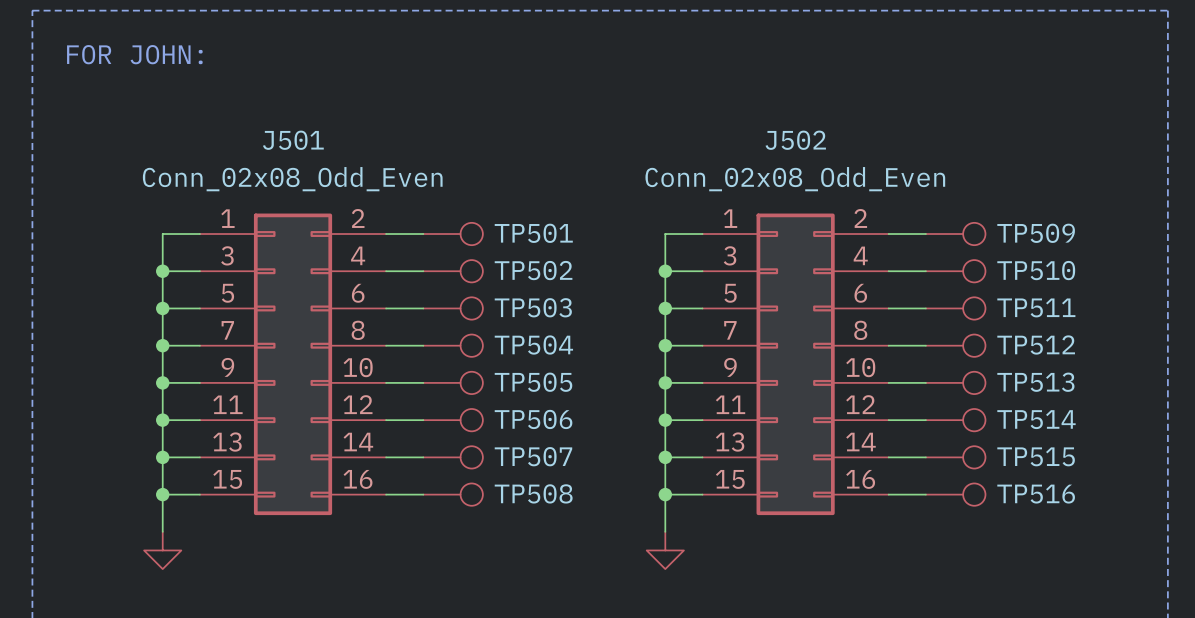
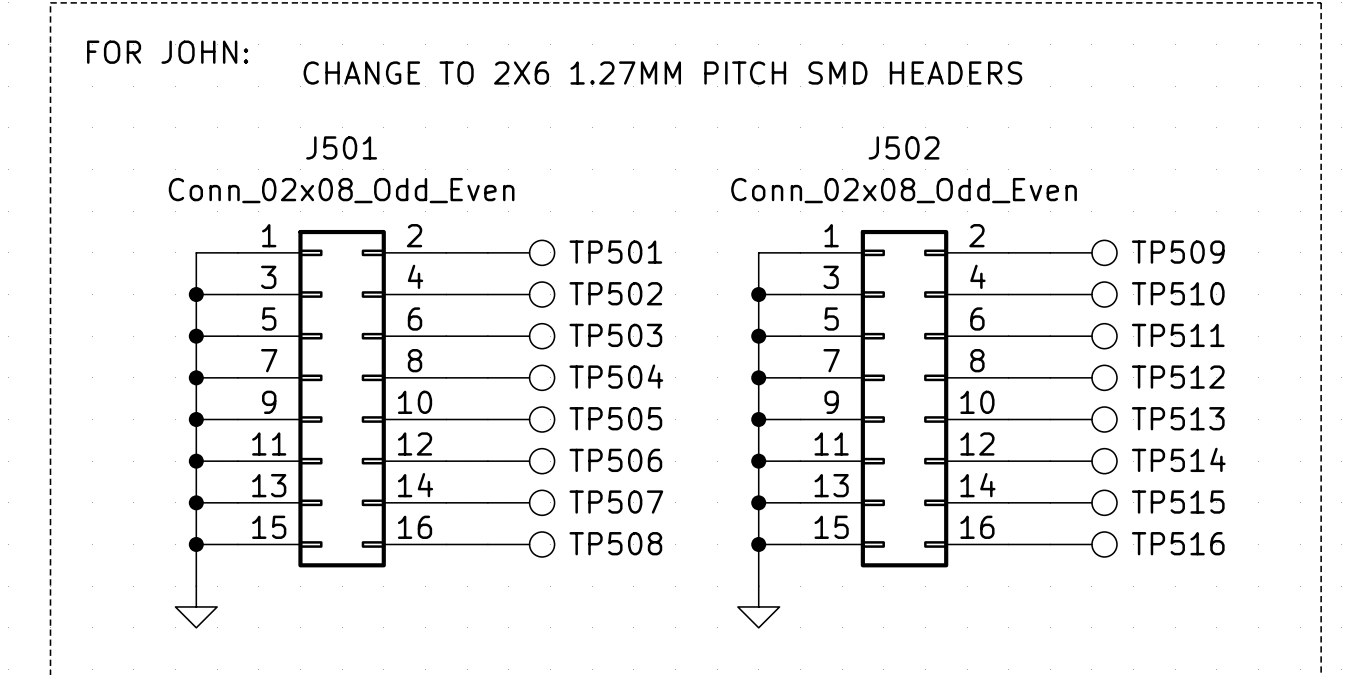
text: none -> CHANGE TO 2X6 1.27MM PITCH SMD HEADERS (662, 73)

